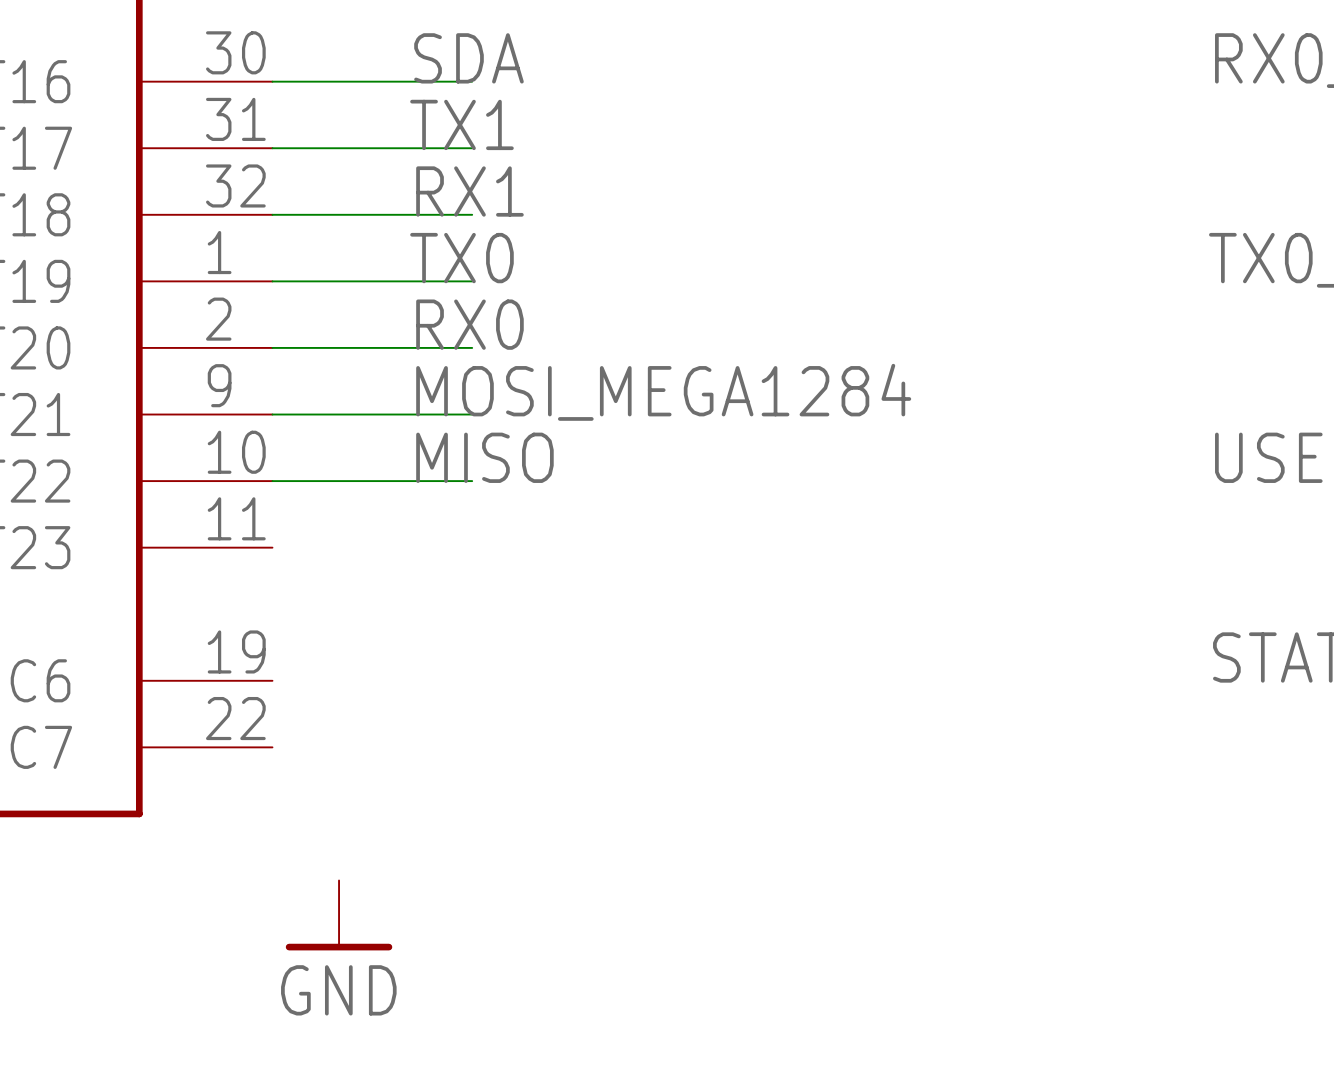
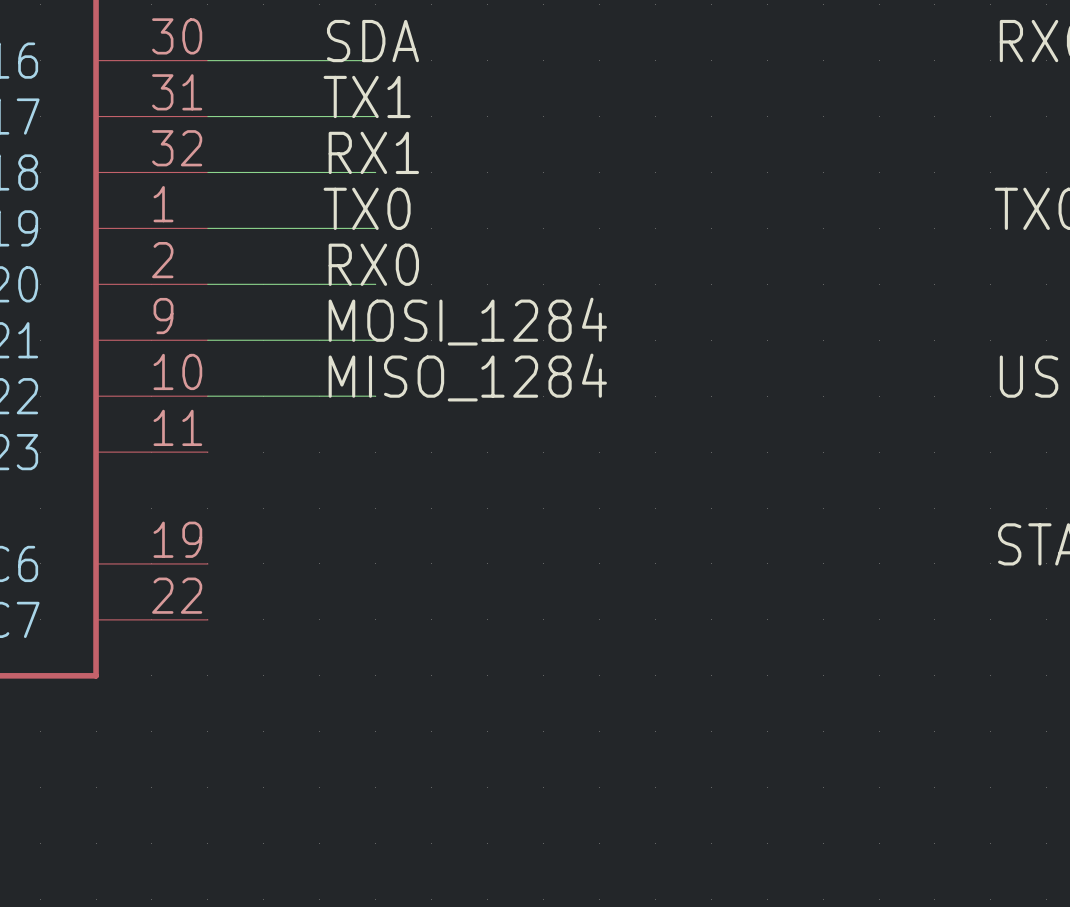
label: MOSI_MEGA1284 (663, 392) -> MOSI_1284 (467, 321)
label: MISO (484, 457) -> MISO_1284 (467, 377)
power symbol: GND (339, 915) -> none

